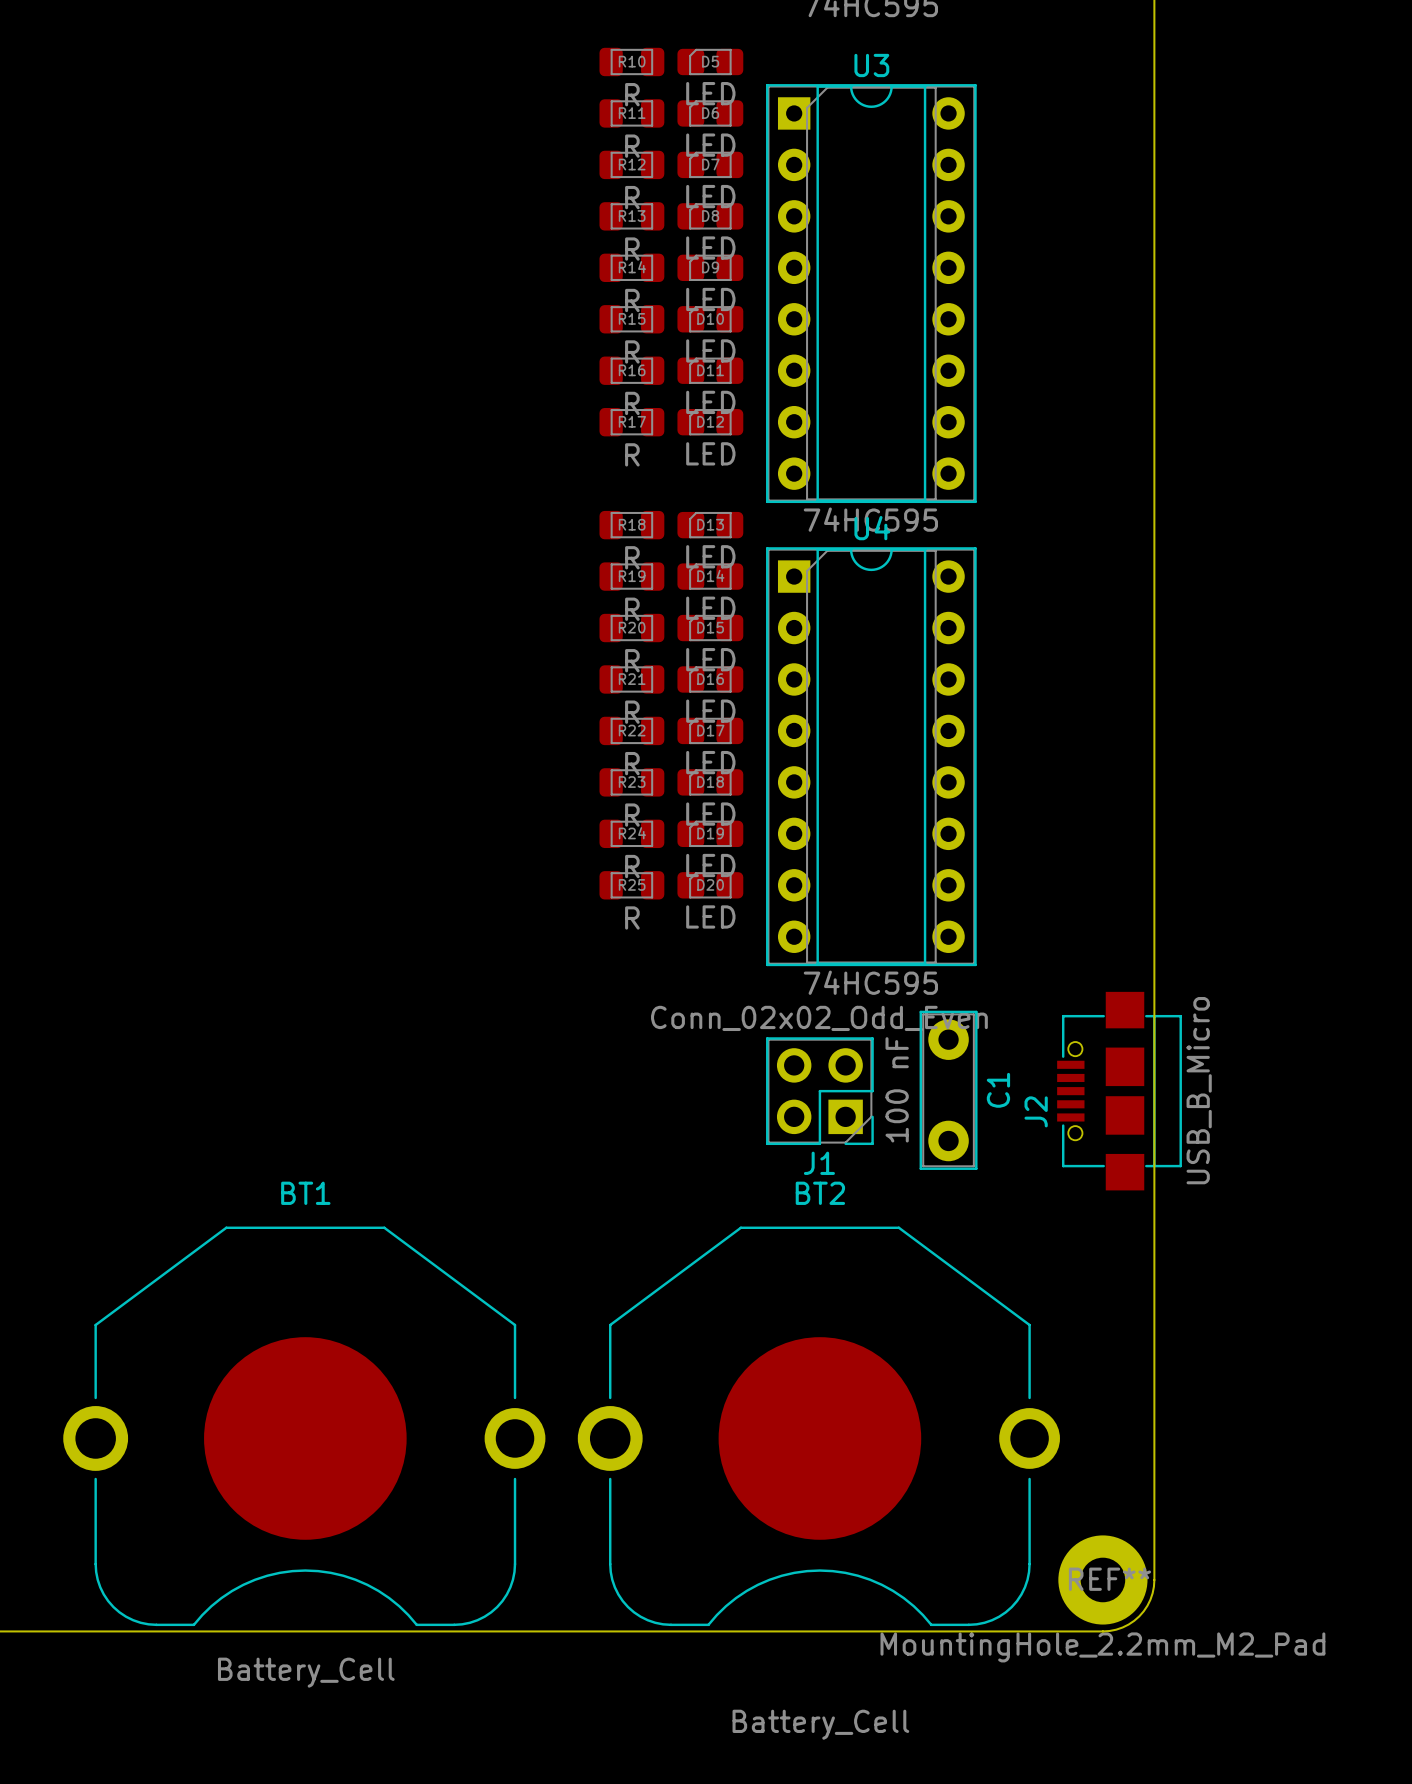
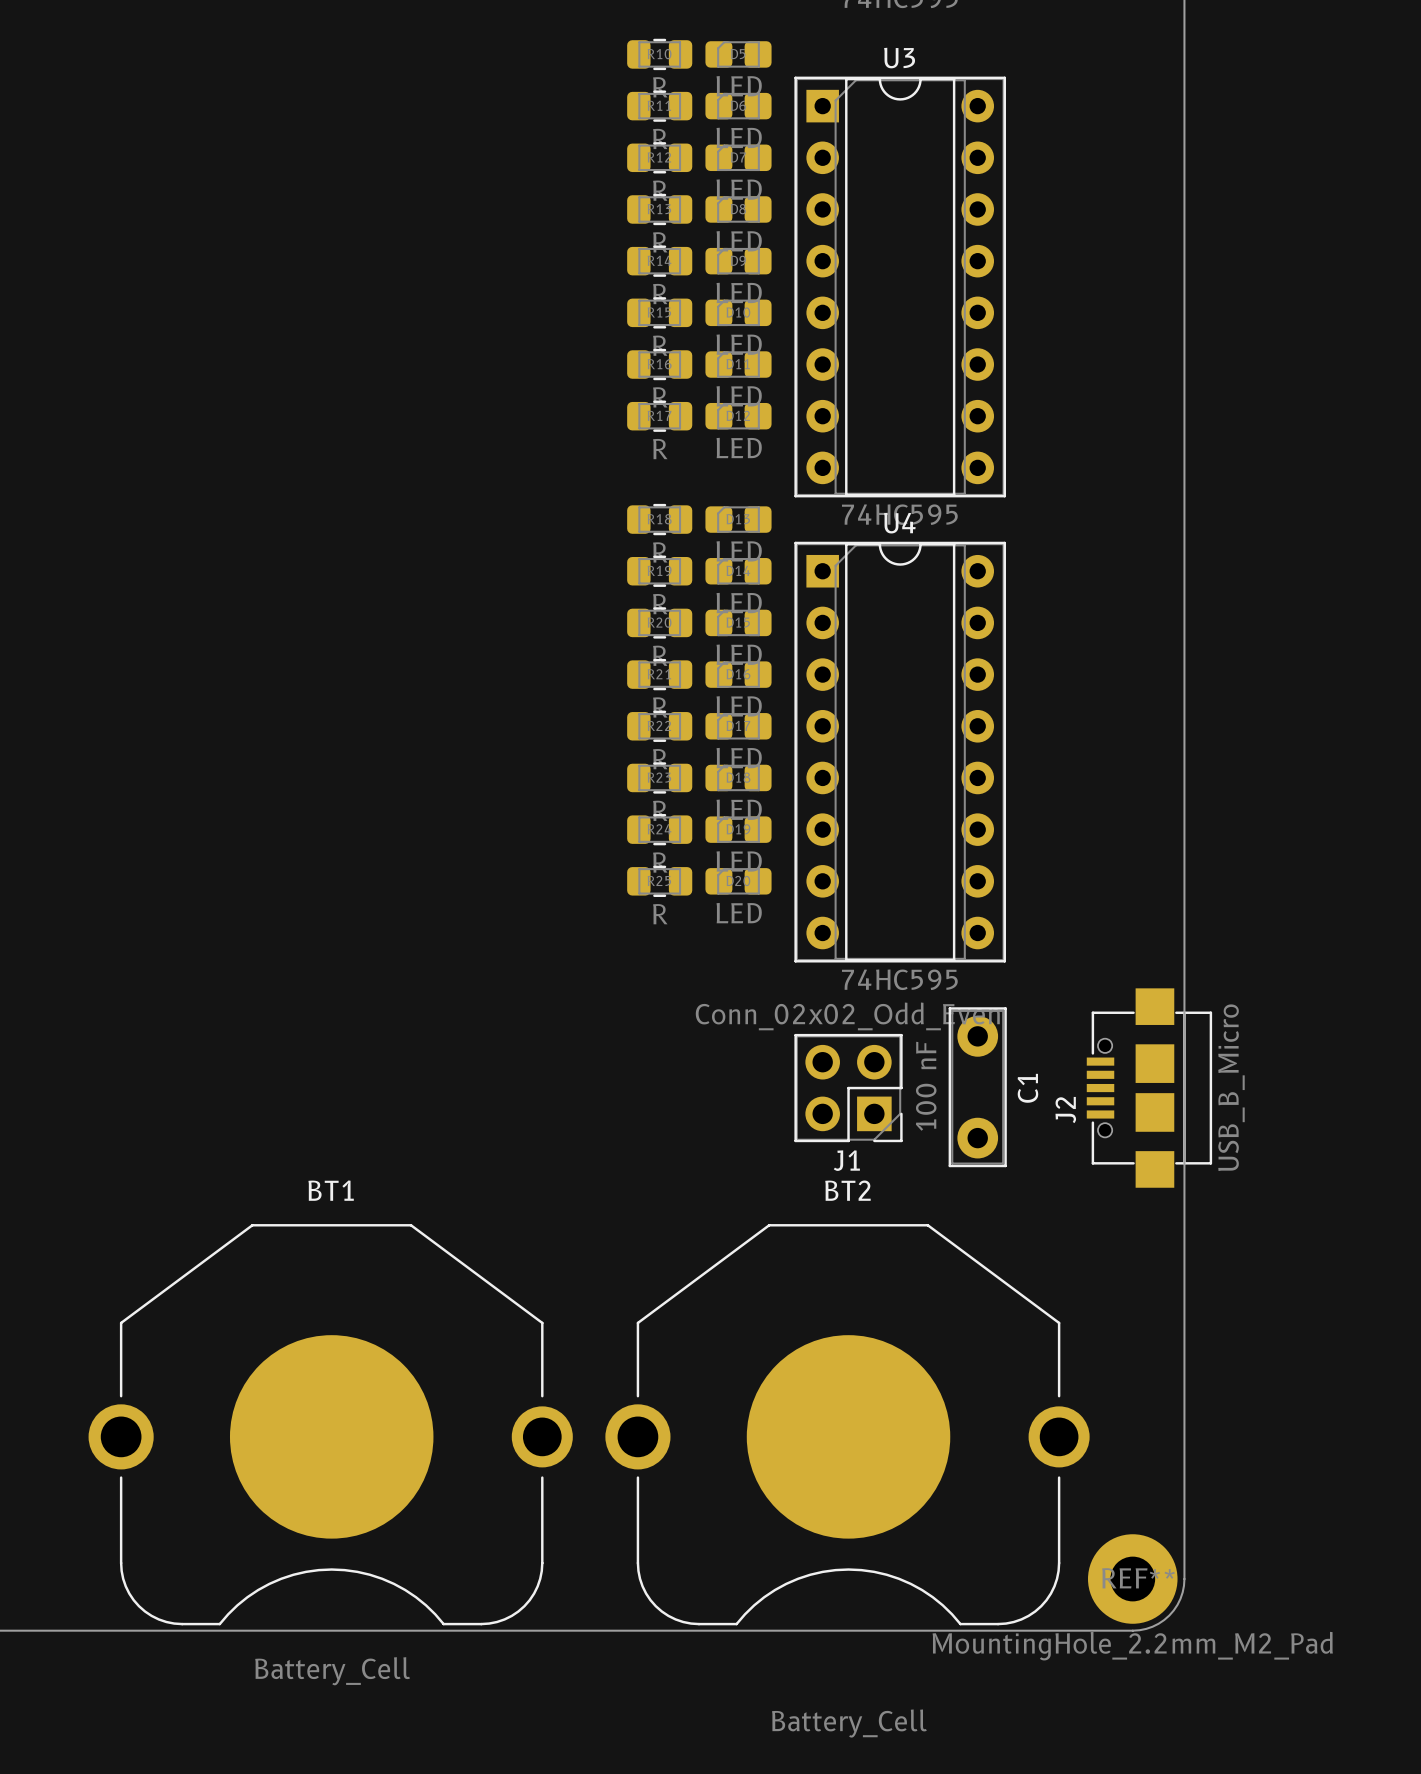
R10 footprint: [599, 47, 665, 77] -> [627, 38, 693, 71]
R11 footprint: [599, 99, 665, 128] -> [627, 90, 693, 122]
R12 footprint: [599, 150, 665, 180] -> [627, 142, 693, 174]
R13 footprint: [599, 202, 665, 231] -> [627, 193, 693, 226]
R14 footprint: [599, 253, 665, 283] -> [627, 245, 693, 277]
R15 footprint: [599, 305, 665, 334] -> [627, 297, 693, 329]
R16 footprint: [599, 356, 665, 385] -> [627, 348, 693, 381]
R17 footprint: [599, 408, 665, 437] -> [627, 400, 693, 432]
R18 footprint: [599, 510, 665, 540] -> [627, 503, 693, 536]
R19 footprint: [599, 562, 665, 591] -> [627, 555, 693, 587]
R20 footprint: [599, 613, 665, 643] -> [627, 607, 693, 639]
R21 footprint: [599, 665, 665, 694] -> [627, 658, 693, 691]
R22 footprint: [599, 716, 665, 746] -> [627, 710, 693, 742]
R23 footprint: [599, 768, 665, 797] -> [627, 762, 693, 794]
R24 footprint: [599, 819, 665, 849] -> [627, 813, 693, 846]
R25 footprint: [599, 871, 665, 900] -> [627, 865, 693, 897]

